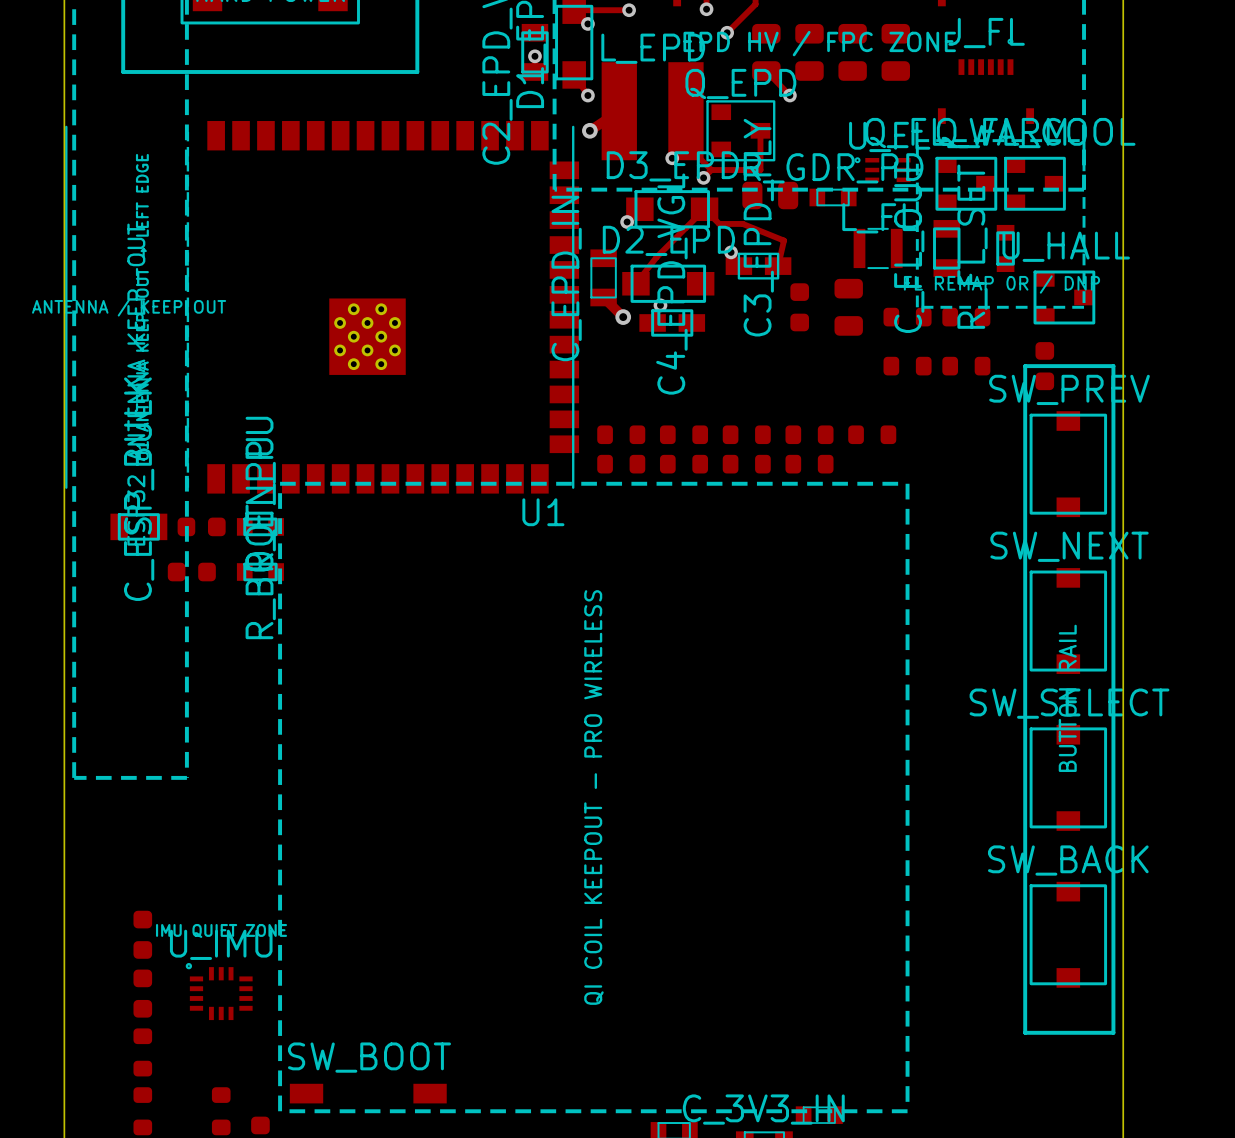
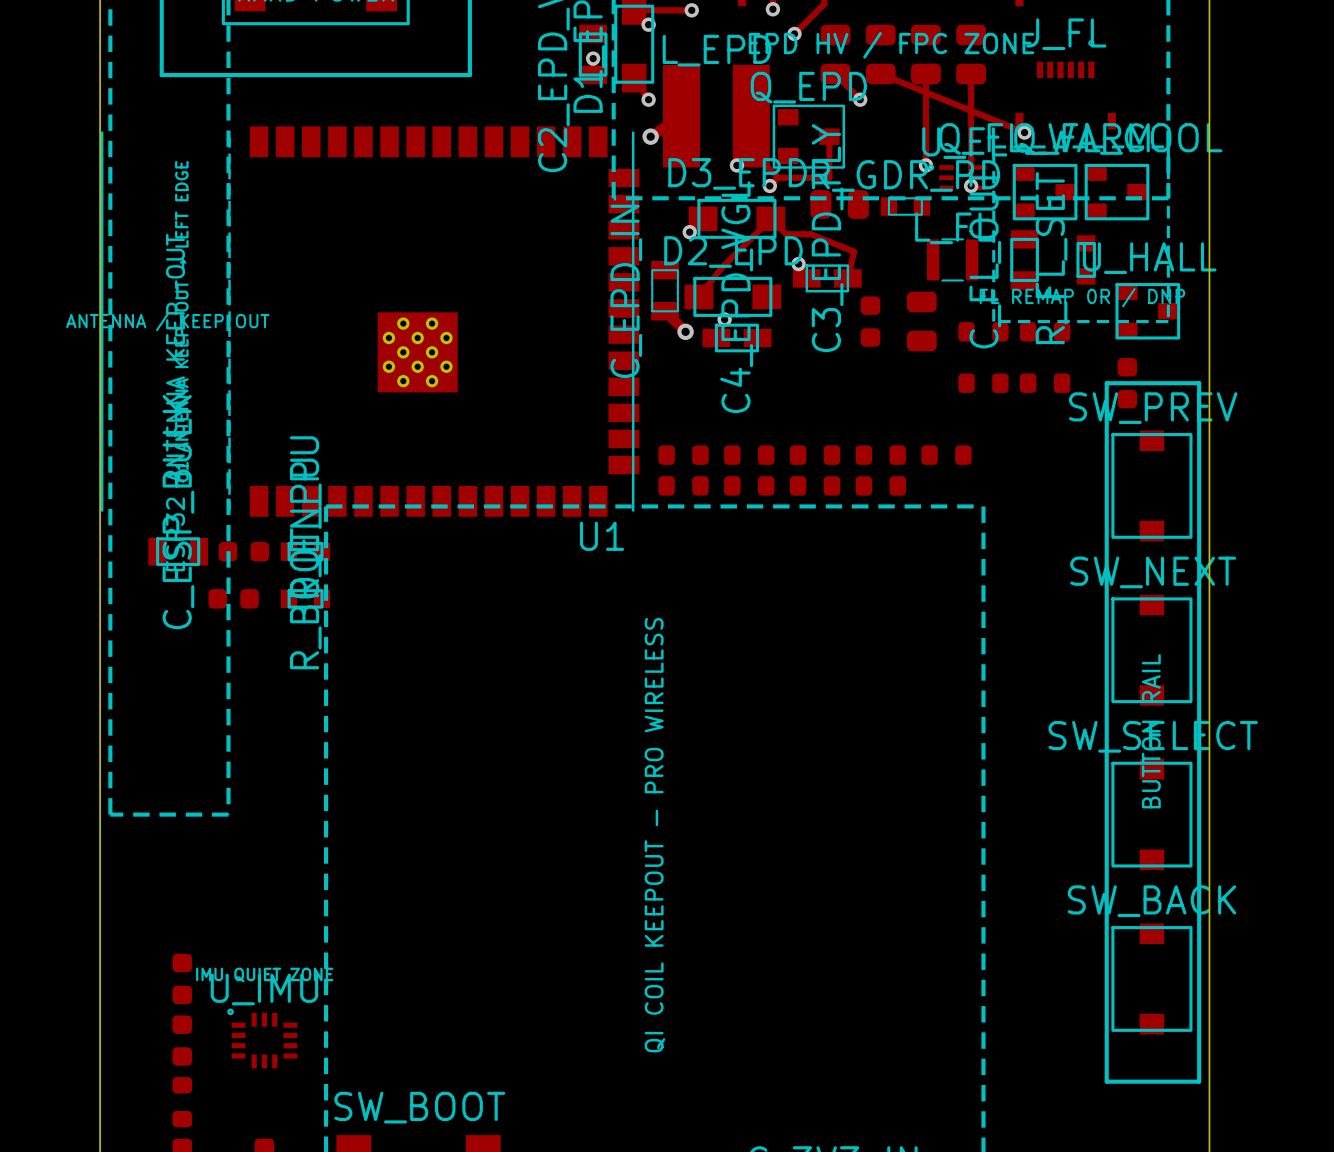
track: none -> (880, 74) (1024, 132)
track: none -> (925, 74) (925, 165)
track: none -> (971, 74) (971, 185)
via: none -> (1024, 132)
via: none -> (925, 165)
via: none -> (971, 185)

